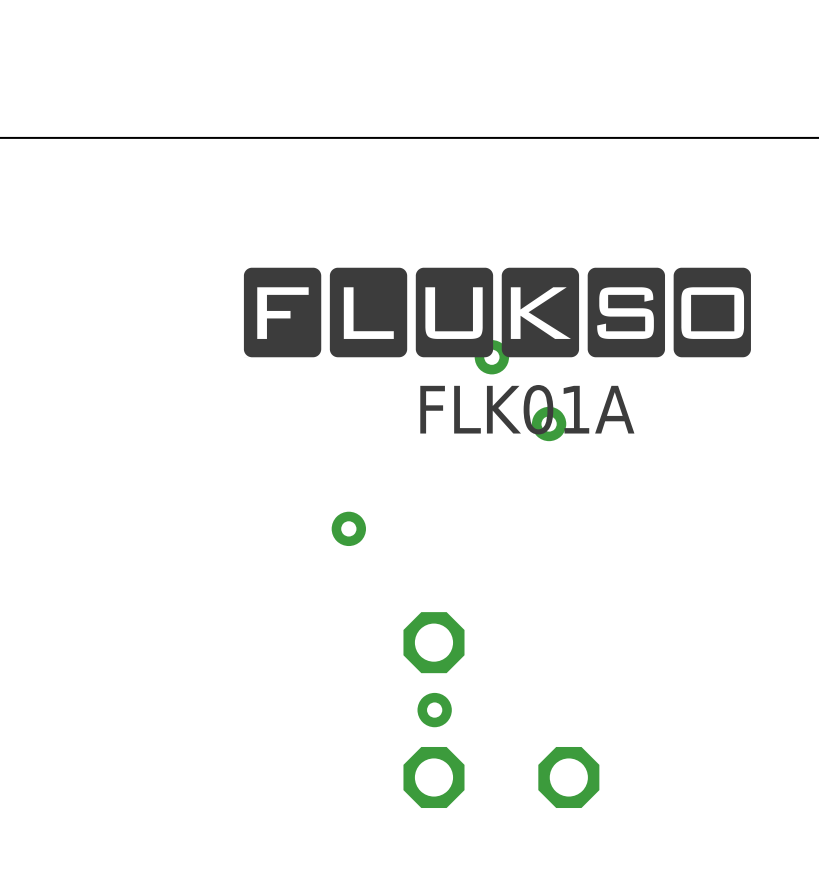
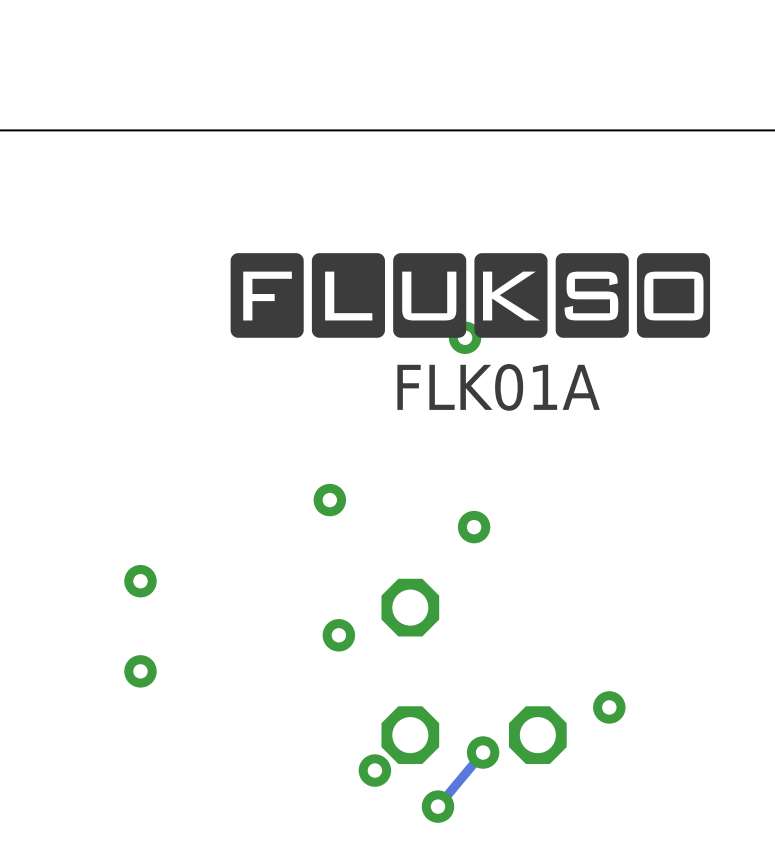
via: (549, 423) -> none
via: none -> (474, 527)
via: none -> (140, 581)
via: none -> (338, 635)
via: none -> (140, 671)
via: (434, 710) -> none
via: none -> (609, 707)
track: none -> (483, 752) (438, 806)
via: none -> (483, 752)
via: none -> (374, 770)
via: none -> (438, 806)

